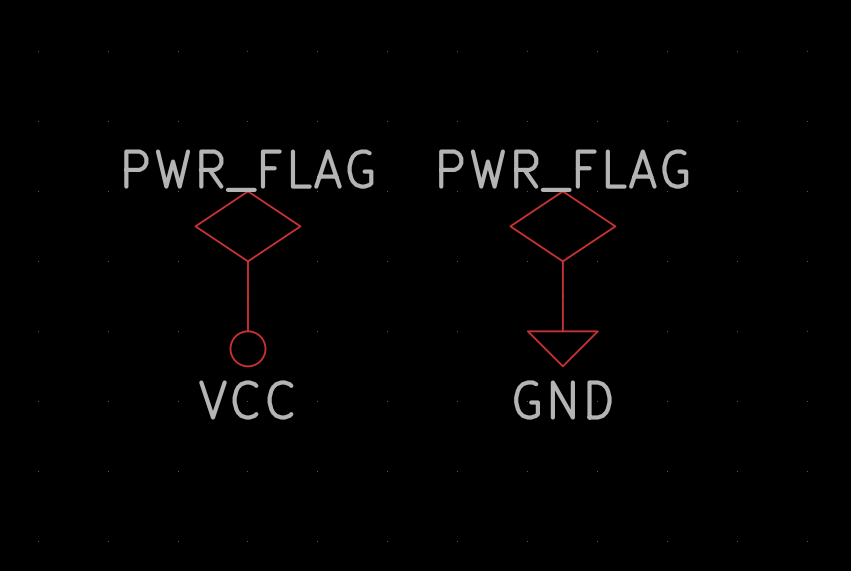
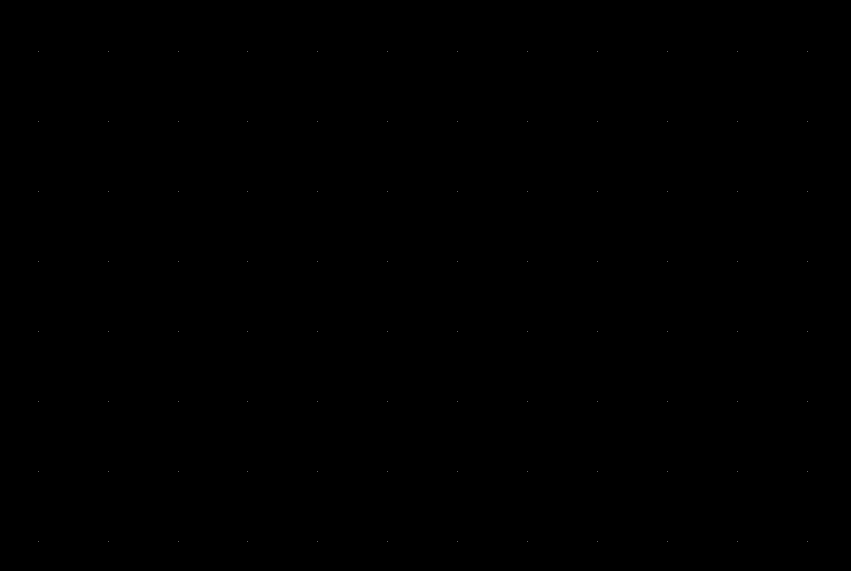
power symbol: PWR_FLAG (247, 243) -> none
power symbol: PWR_FLAG (562, 243) -> none
power symbol: VCC (247, 331) -> none
power symbol: GND (562, 331) -> none

